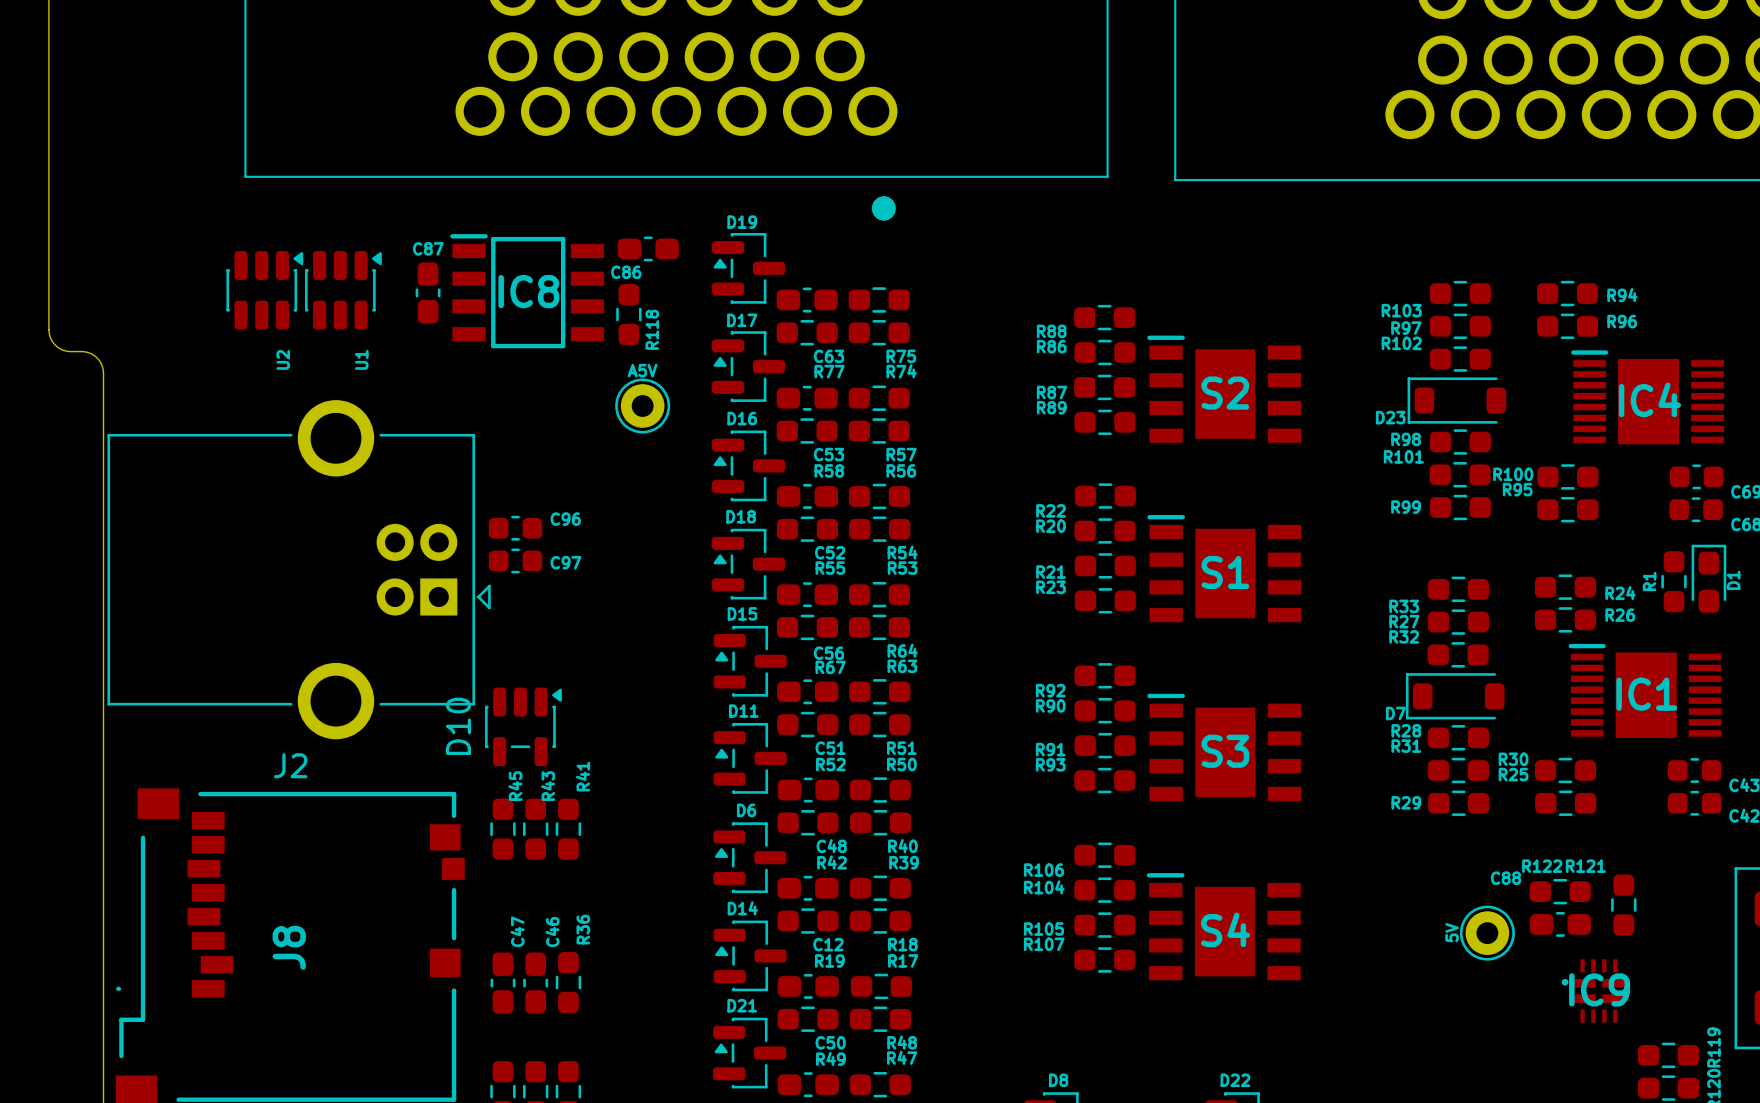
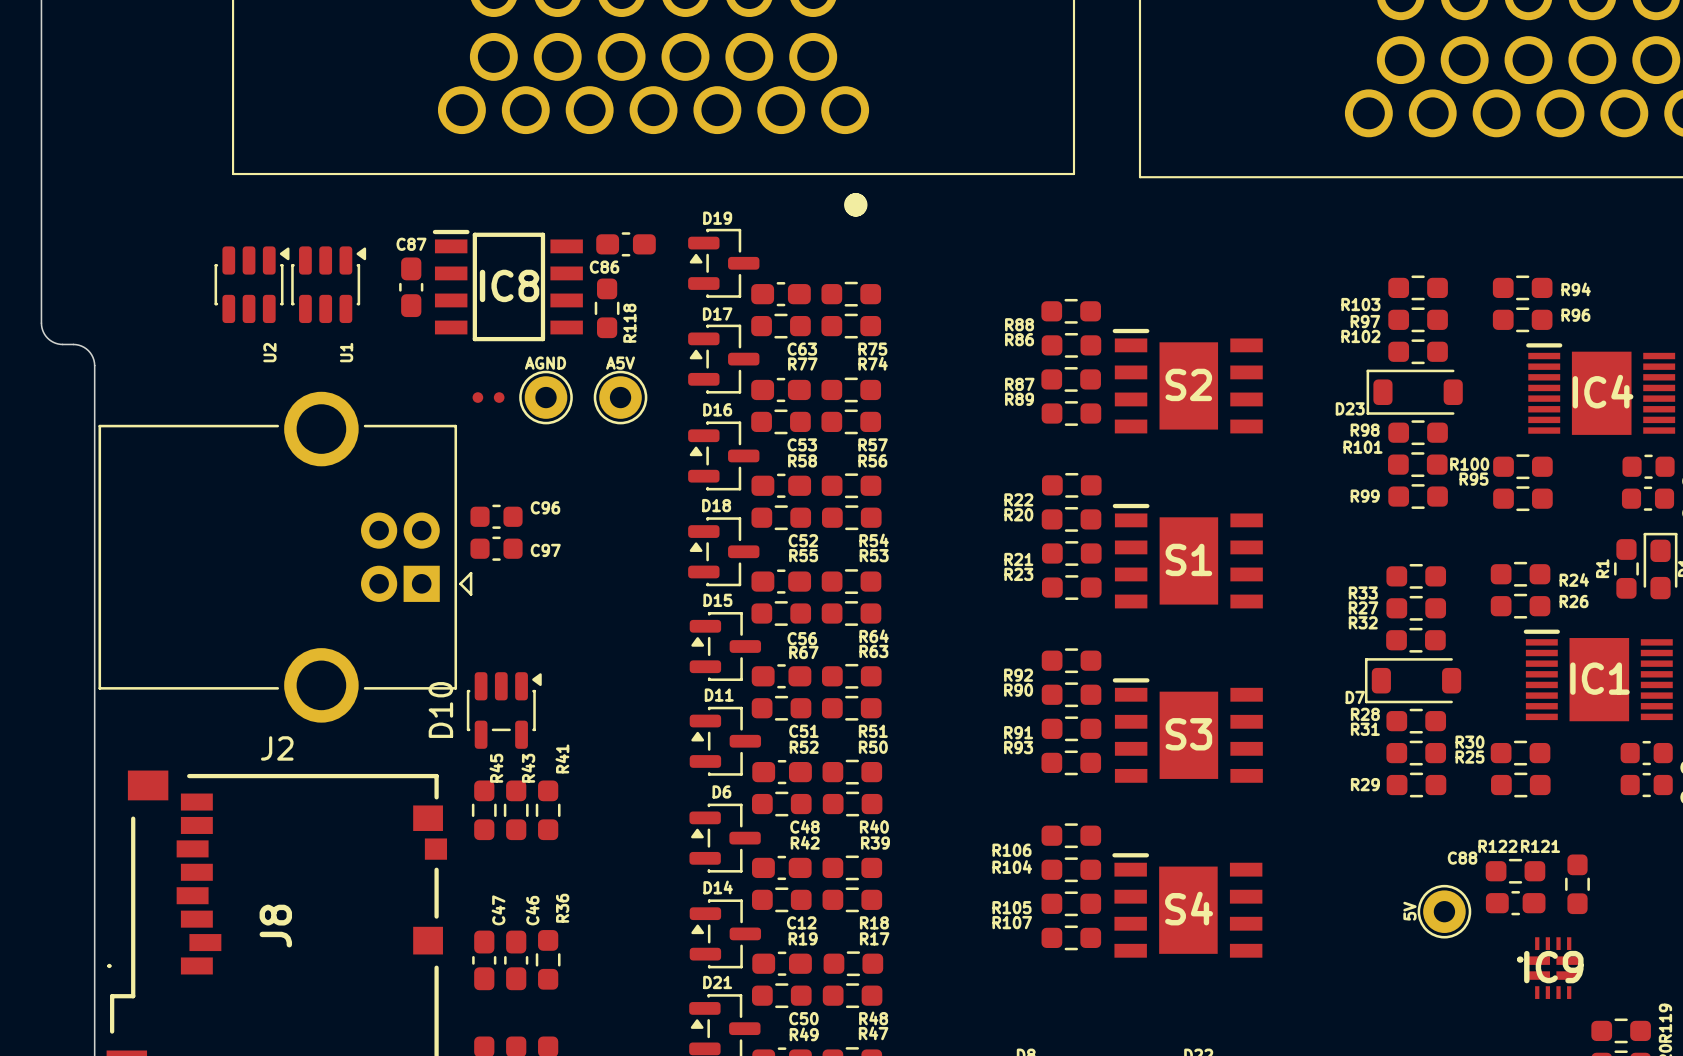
part: none -> (488, 397)
part: none -> AGND (546, 397)

